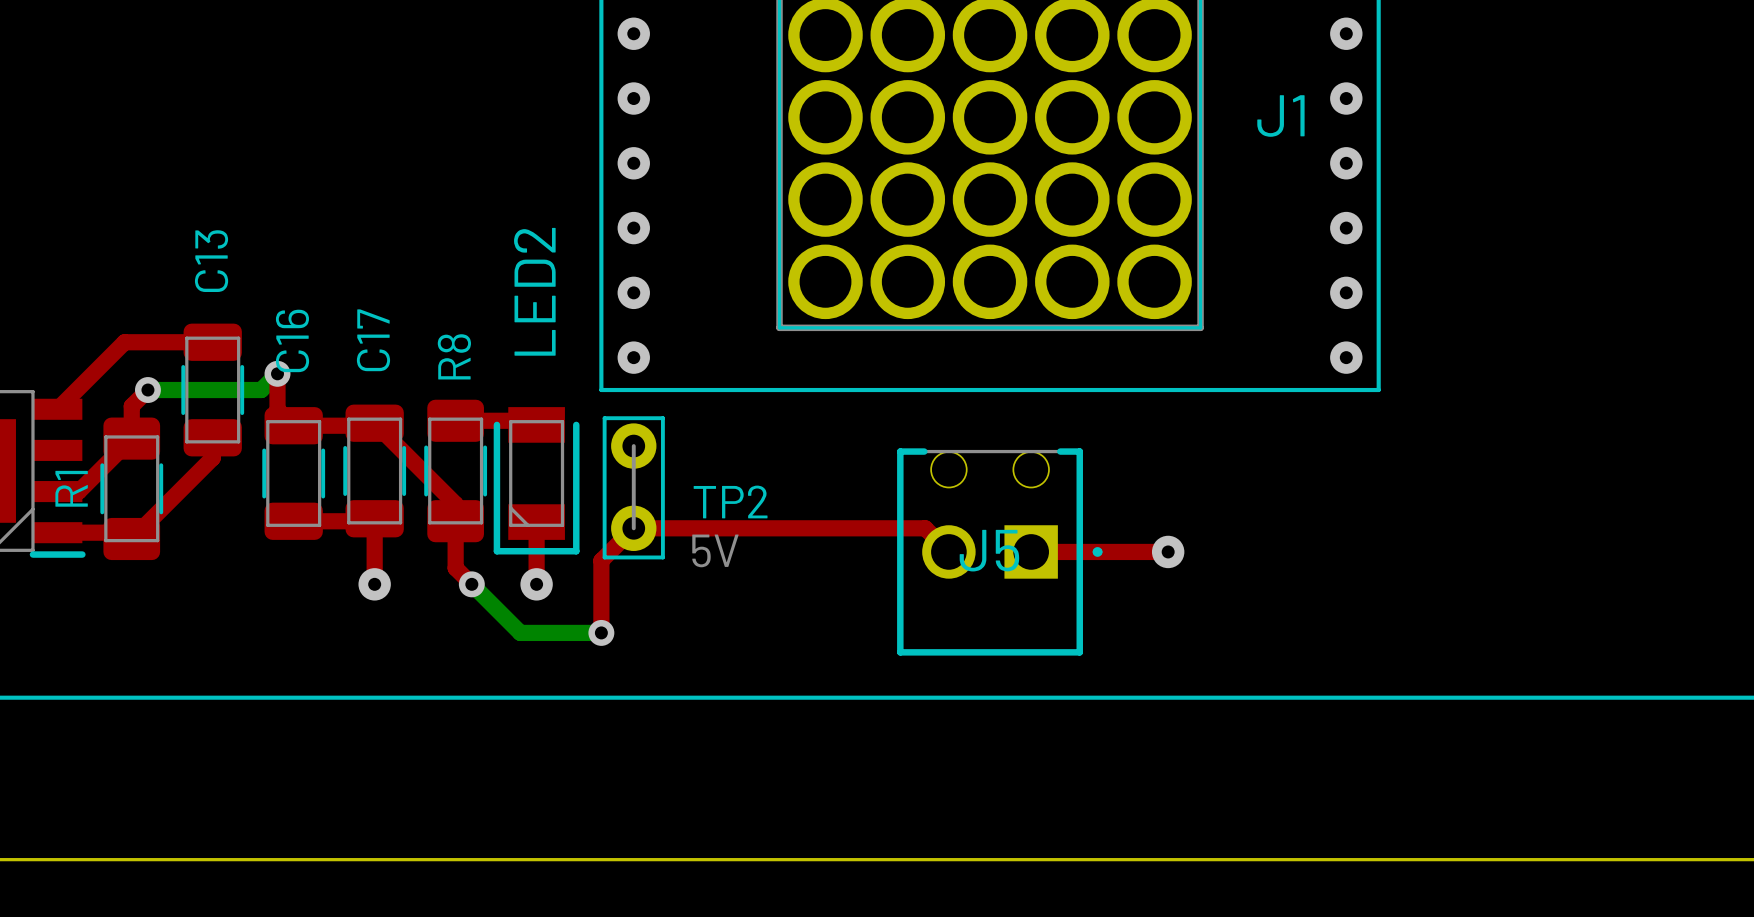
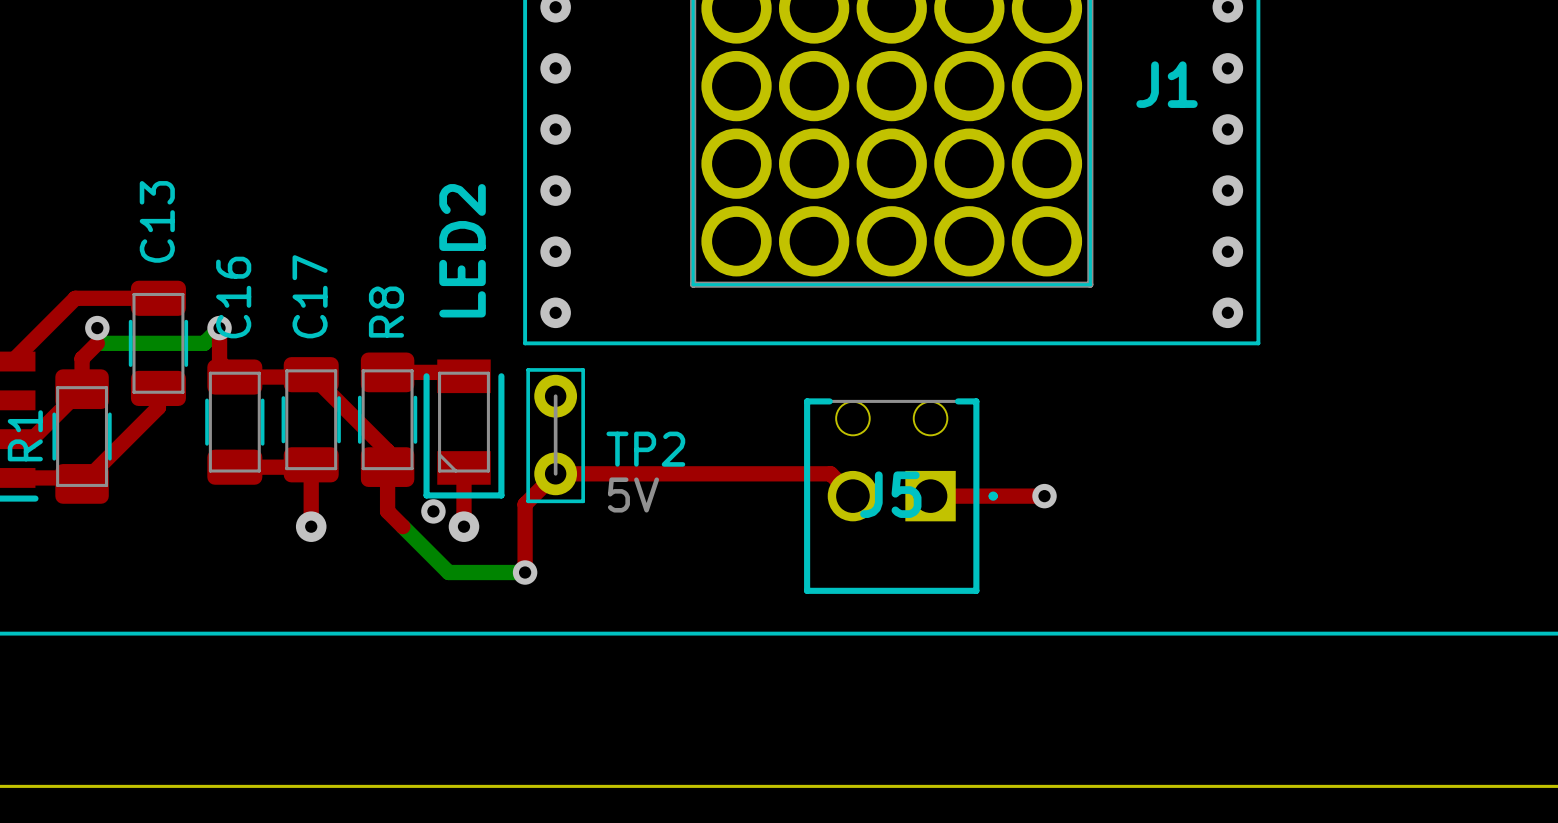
via position: (147, 390) -> (97, 328)
via position: (1168, 551) -> (1044, 496)
via position: (471, 584) -> (433, 511)

